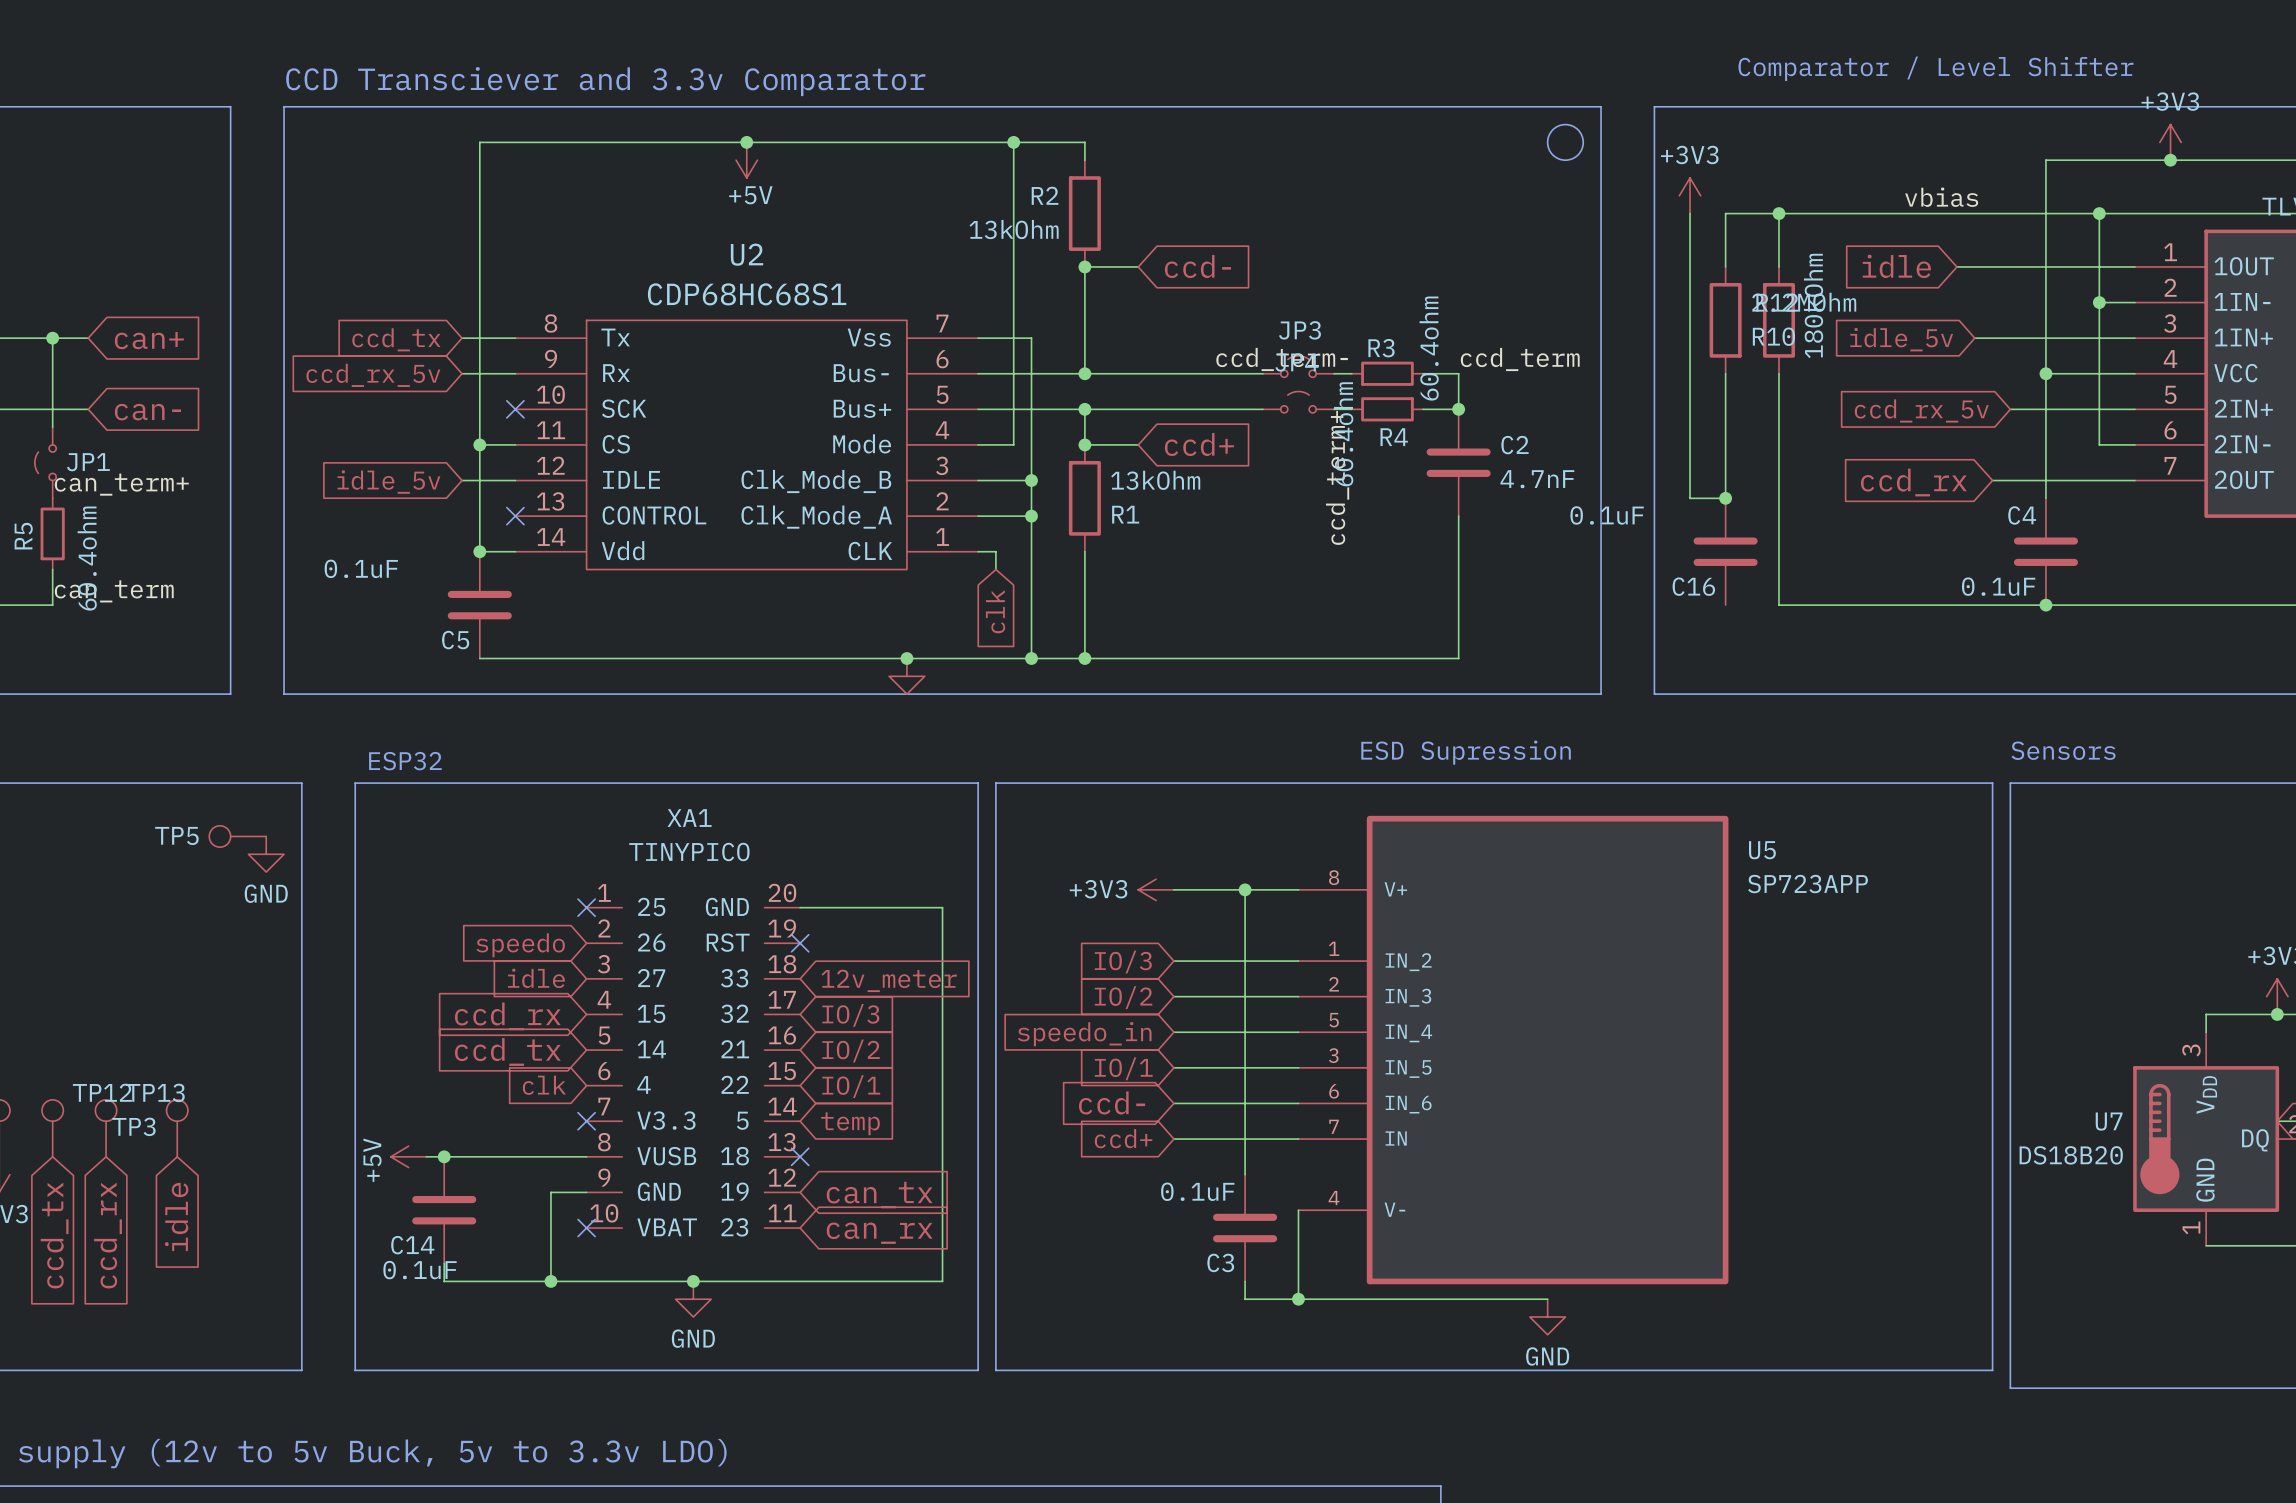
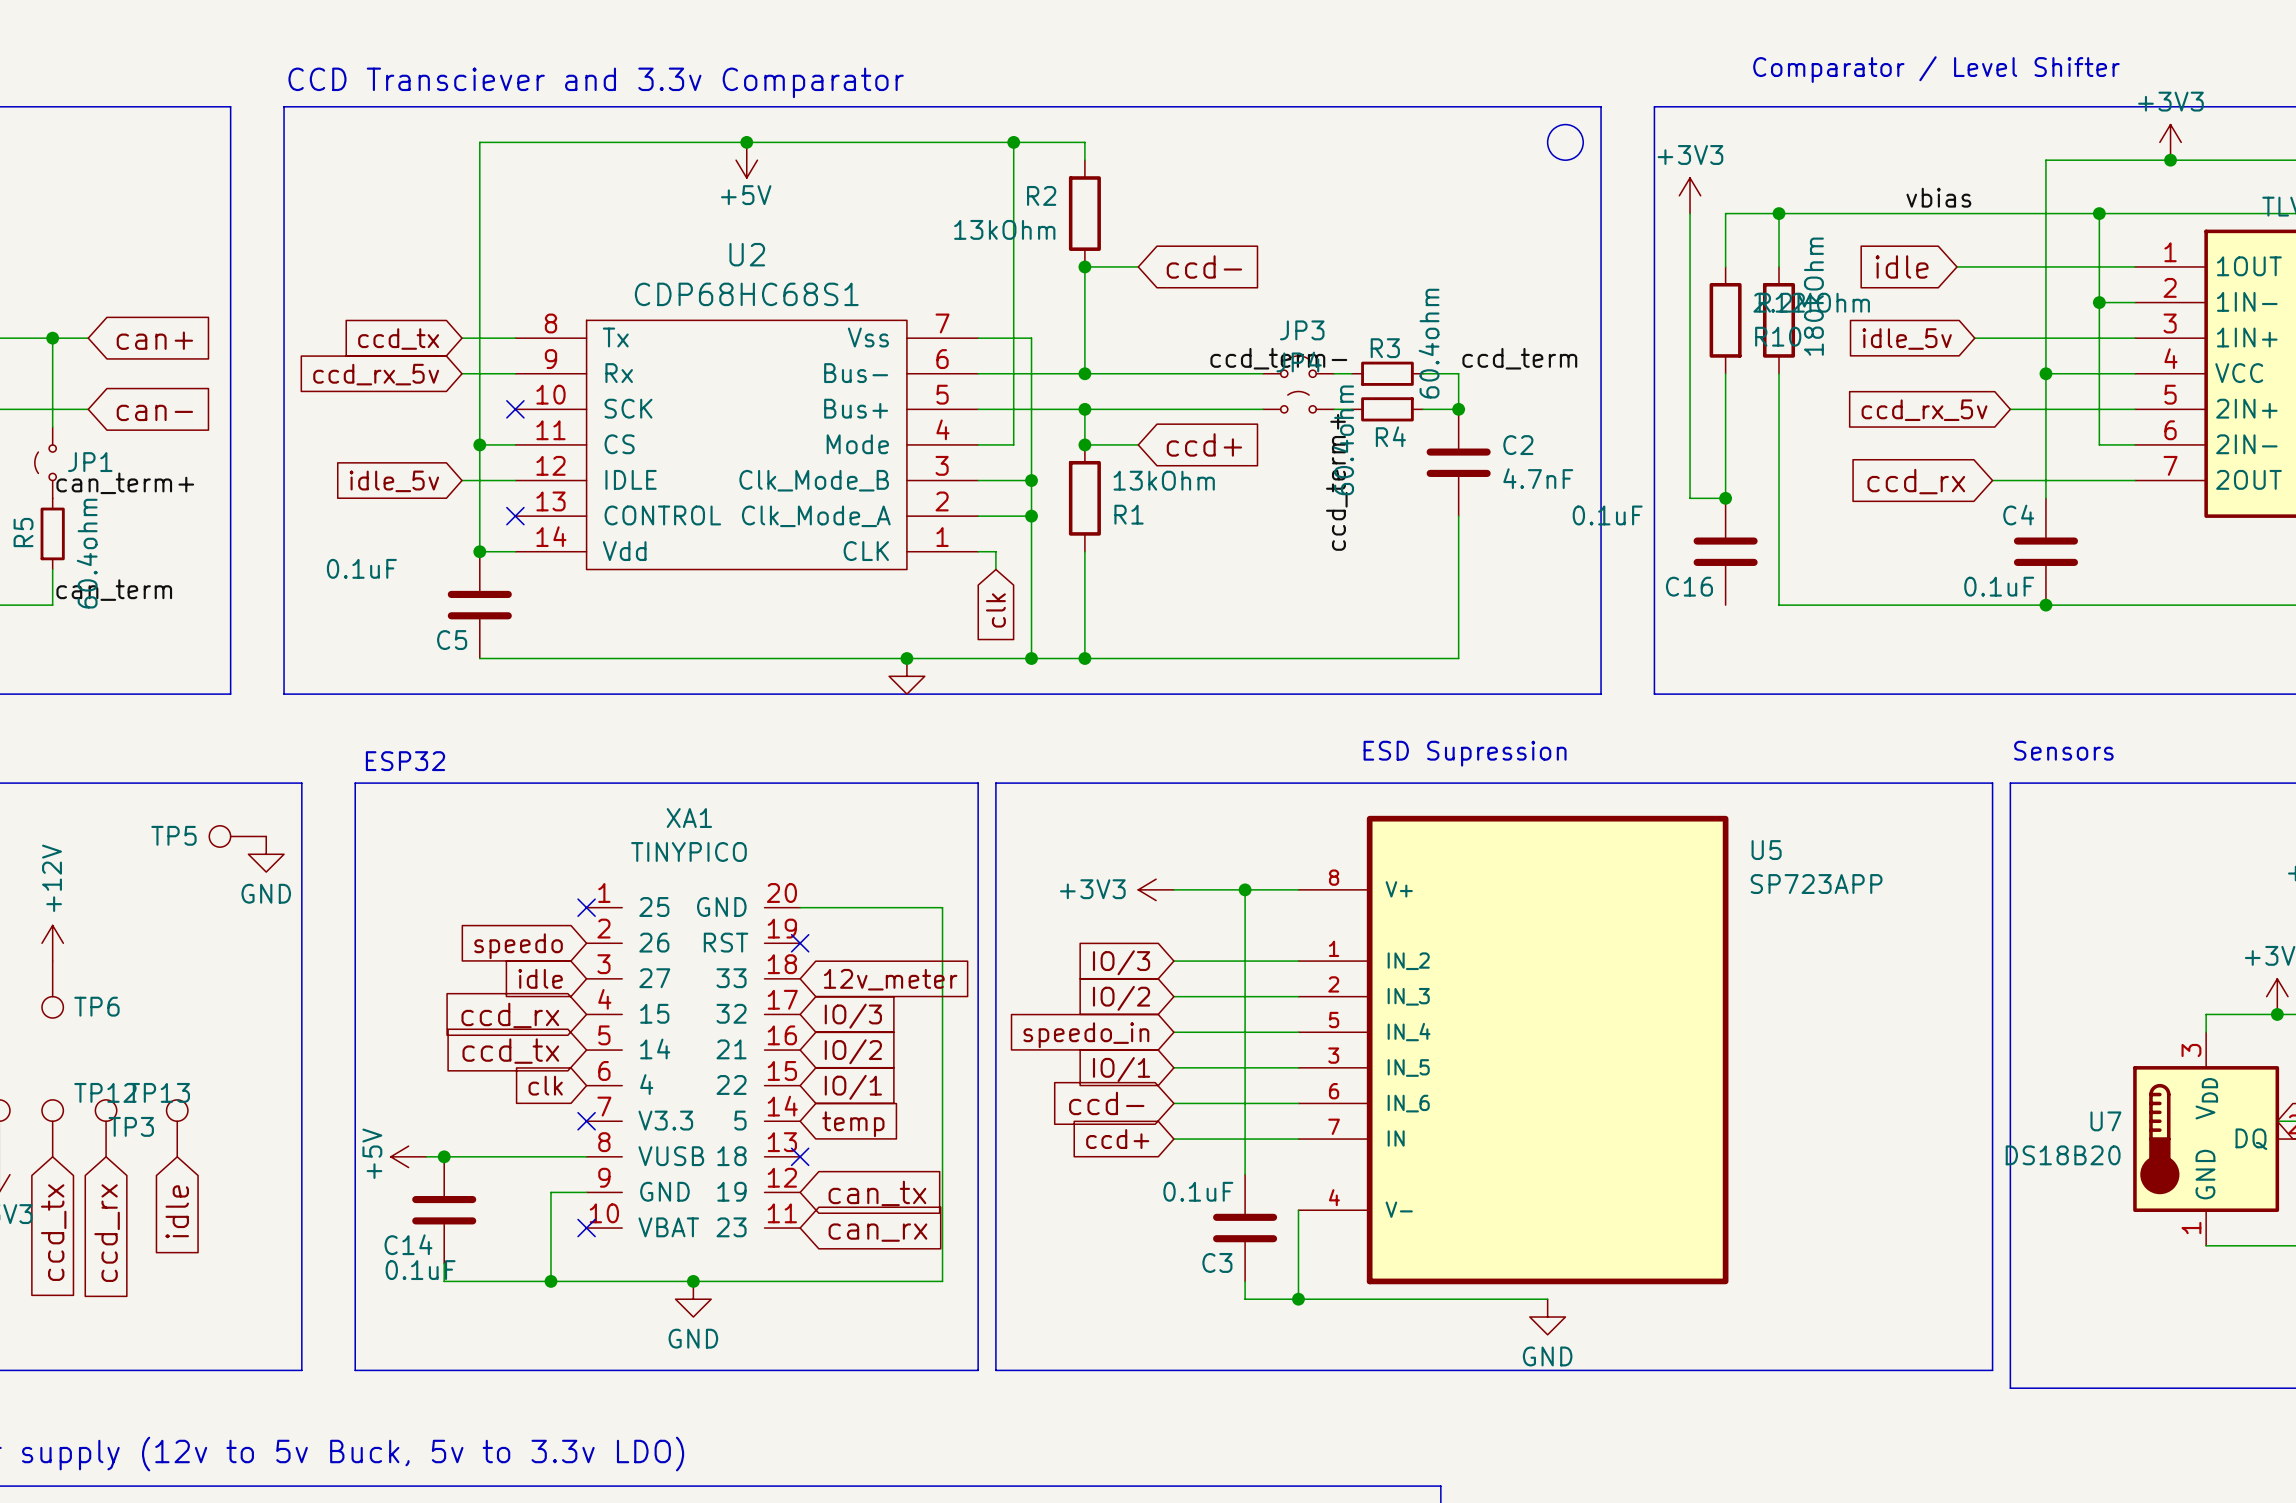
power symbol: none -> +12V (52, 943)
TP6: none -> (52, 989)

